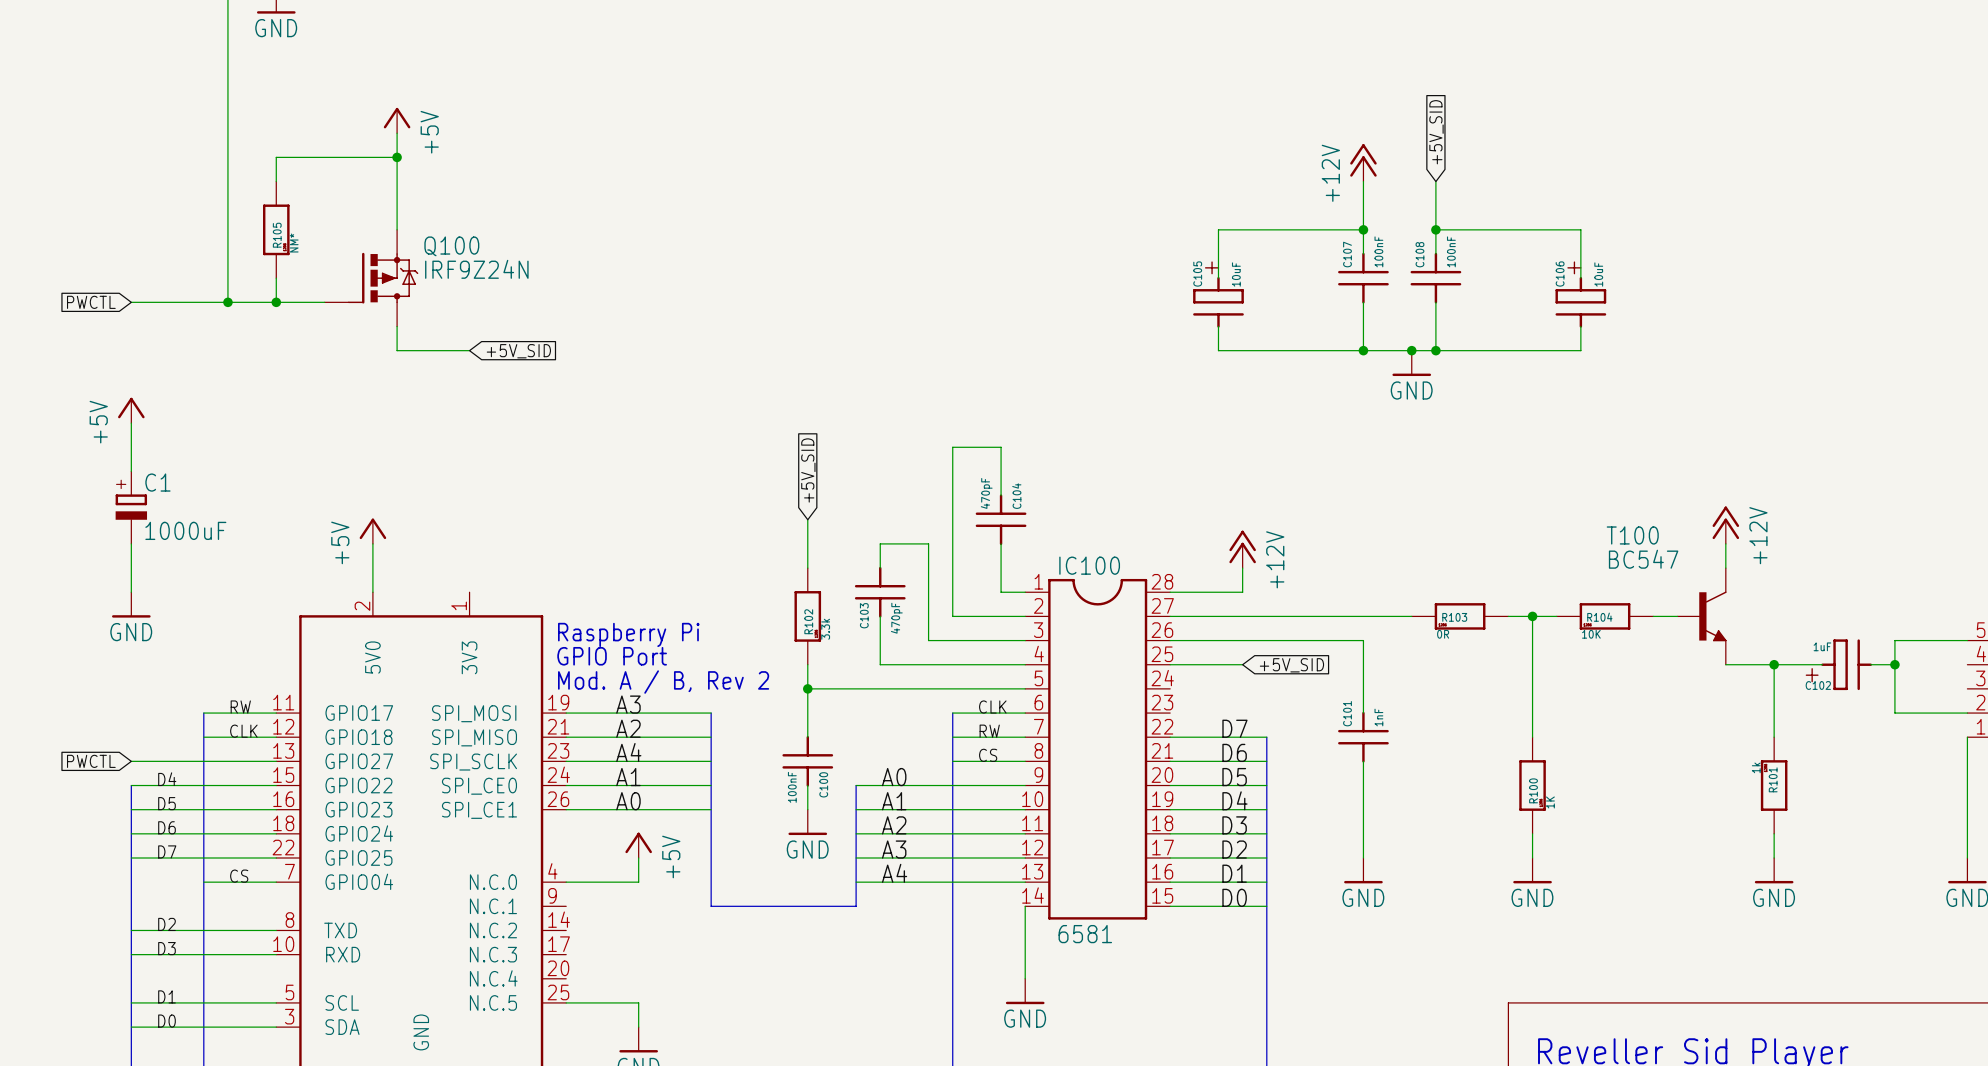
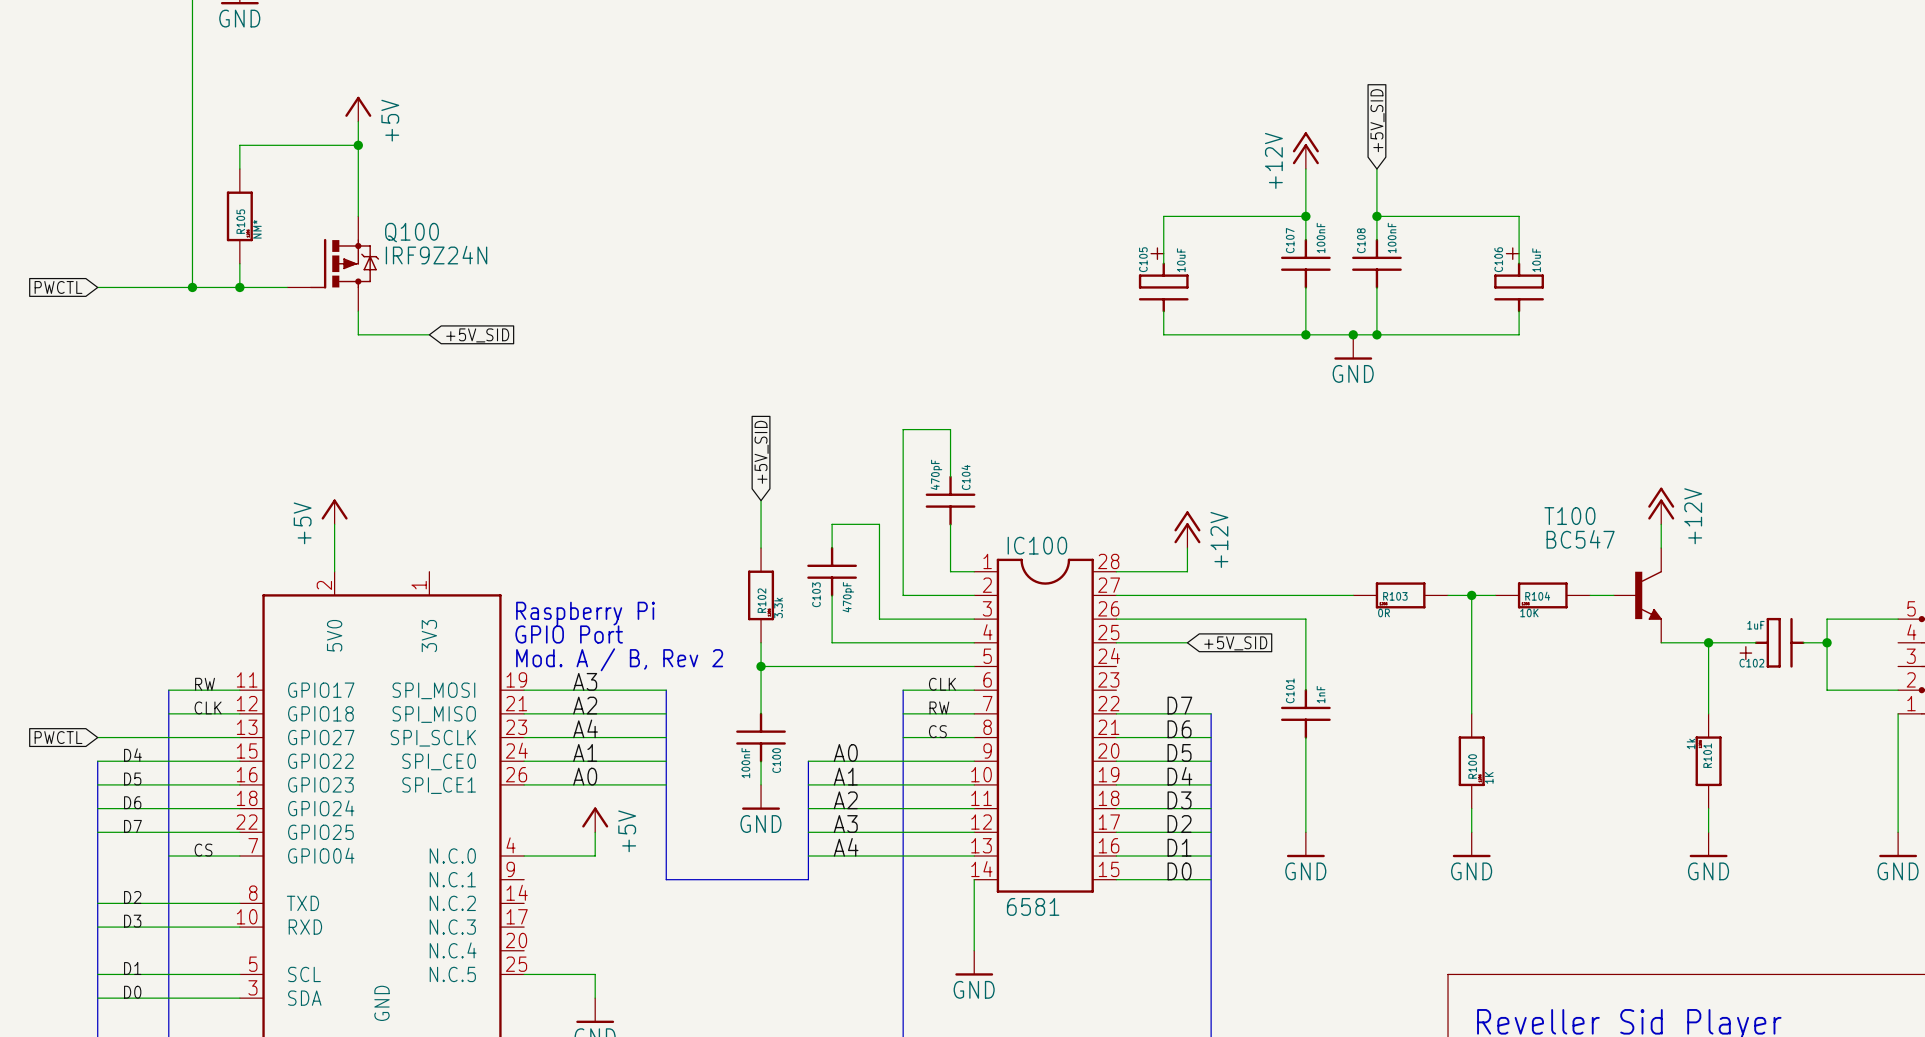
power symbol: +5V (131, 410) -> none
wire: (131, 423) (131, 471) -> none
C1: 1000uF (131, 507) -> none
wire: (131, 543) (131, 592) -> none
power symbol: GND (131, 604) -> none

